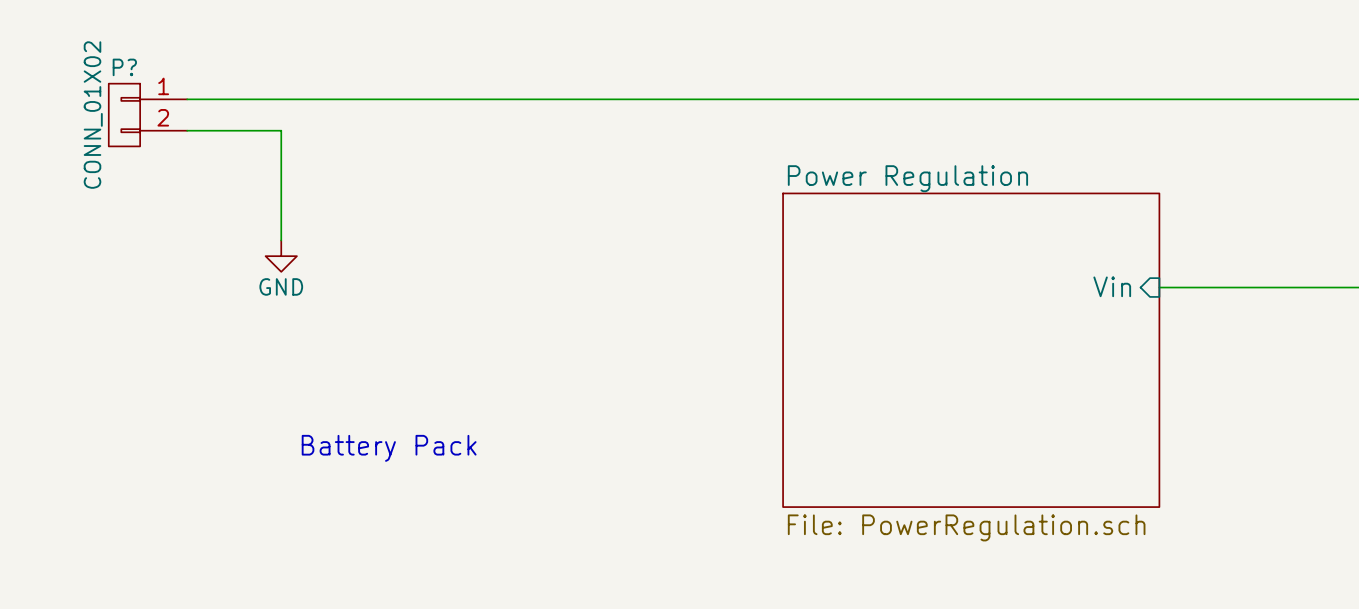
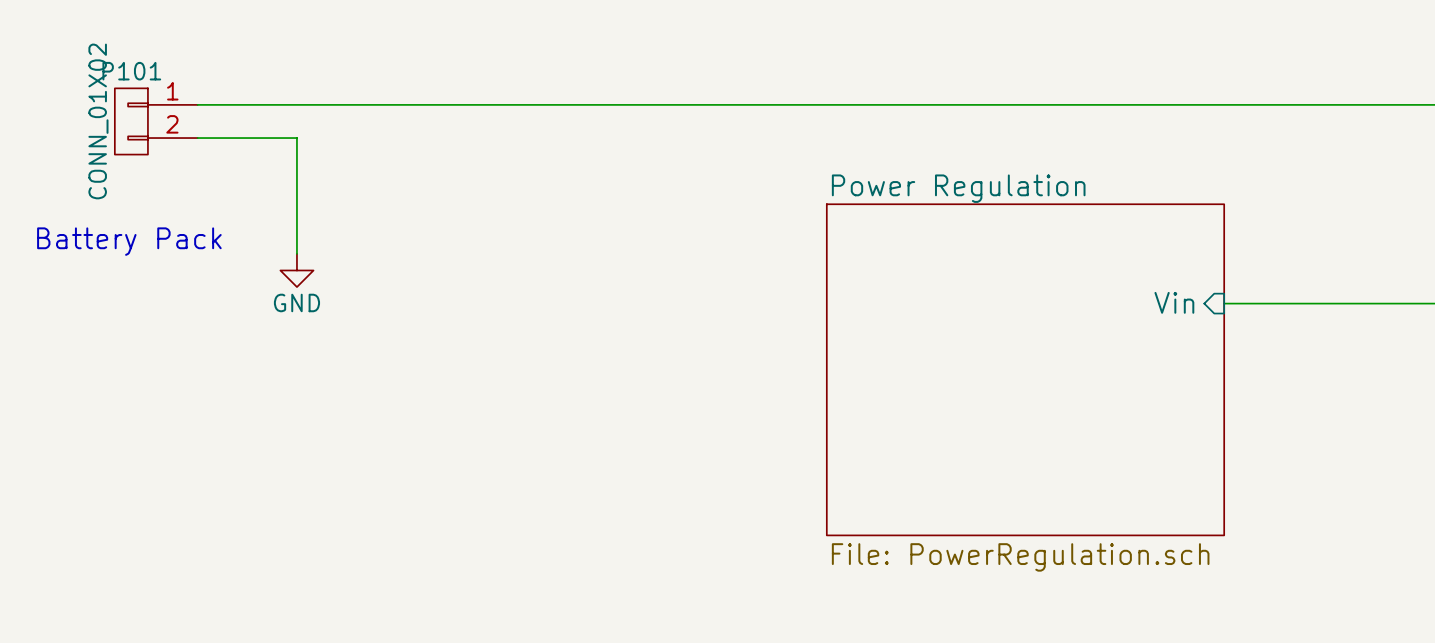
P? name: P? (124, 67) -> P101 (131, 71)
text: none -> Battery Pack (129, 241)
text: Battery Pack (389, 448) -> none

